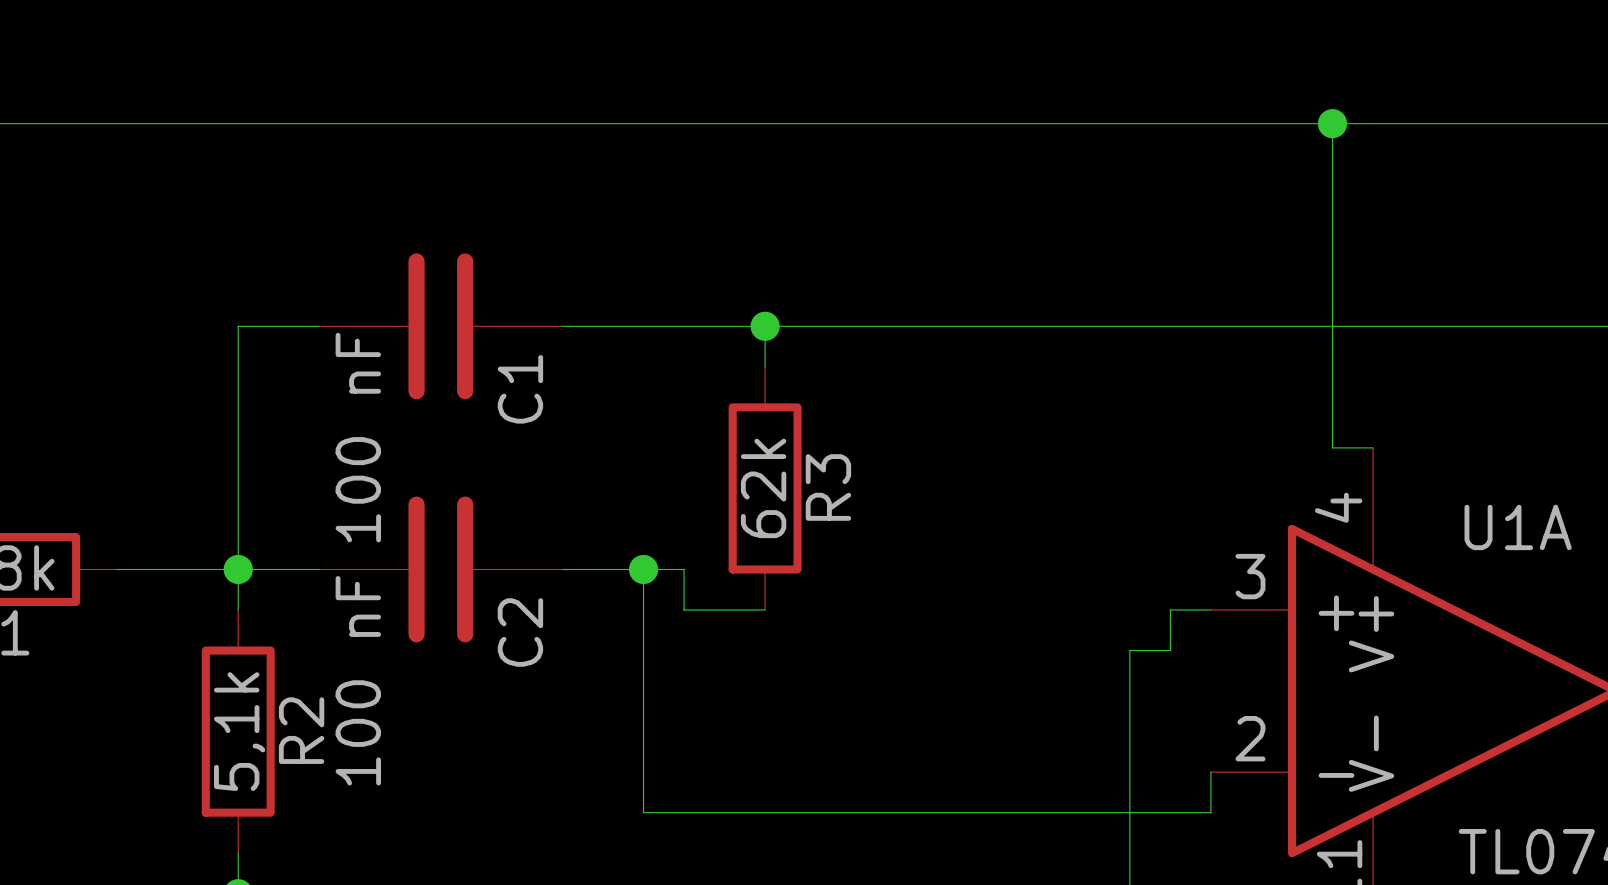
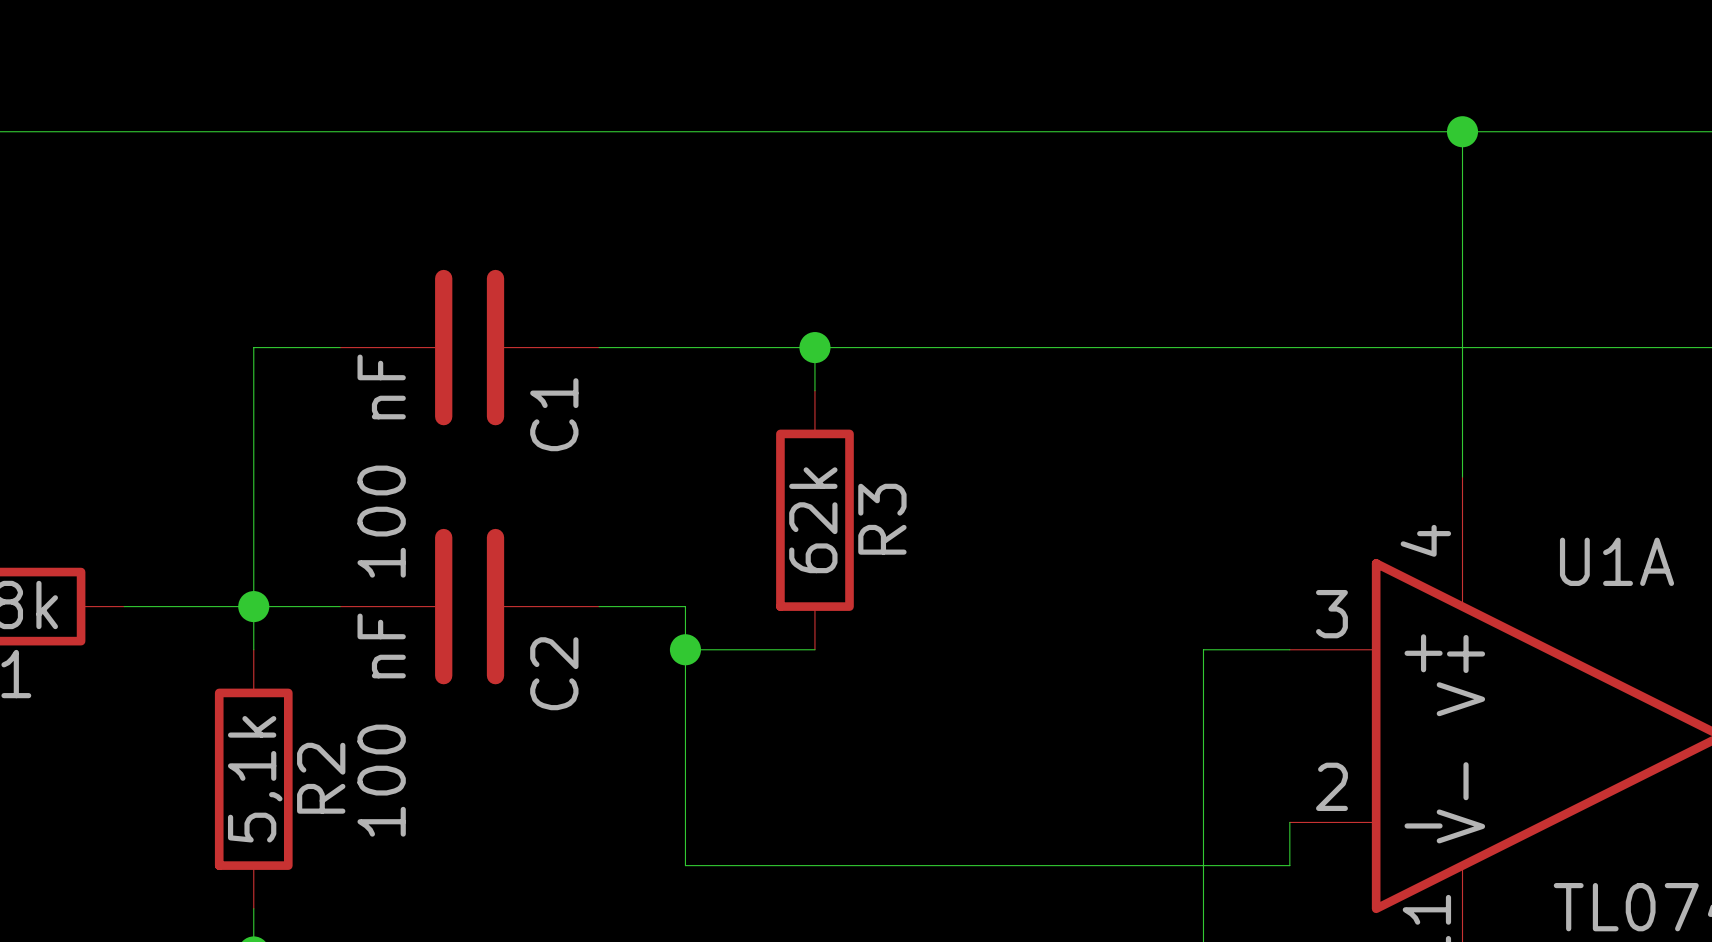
wire: (1332, 123) (1332, 447) (1373, 447) -> (1462, 131) (1462, 477)
junction position: (1332, 123) -> (1462, 131)
wire: (643, 569) (684, 569) (684, 610) -> (685, 649) (728, 649)
junction position: (643, 569) -> (685, 649)
wire: (1170, 610) (1170, 650) (1129, 650) -> (1246, 649) (1203, 649) (1203, 692)

